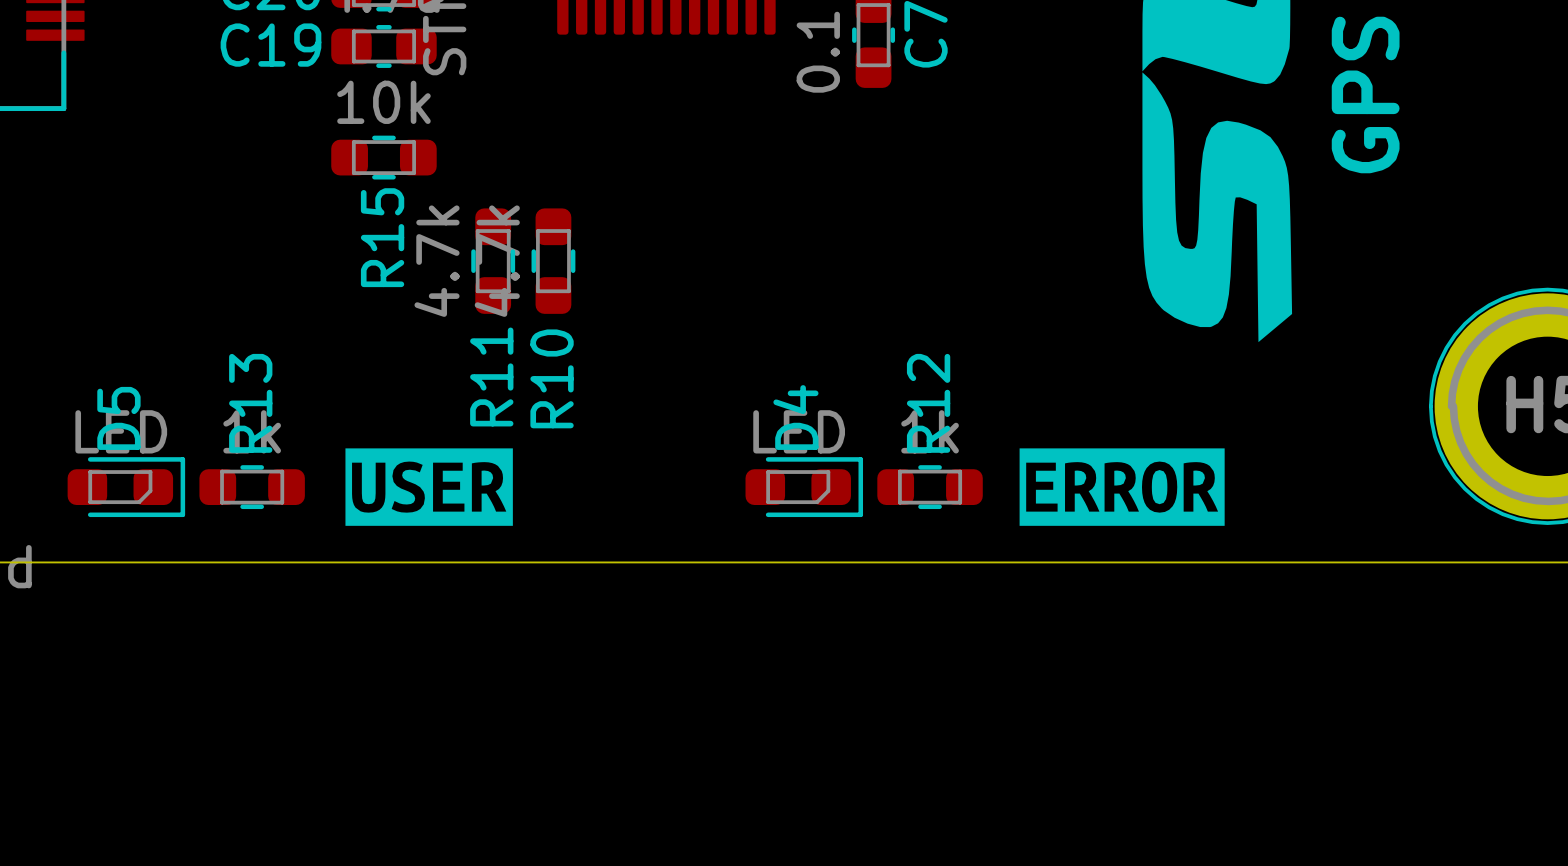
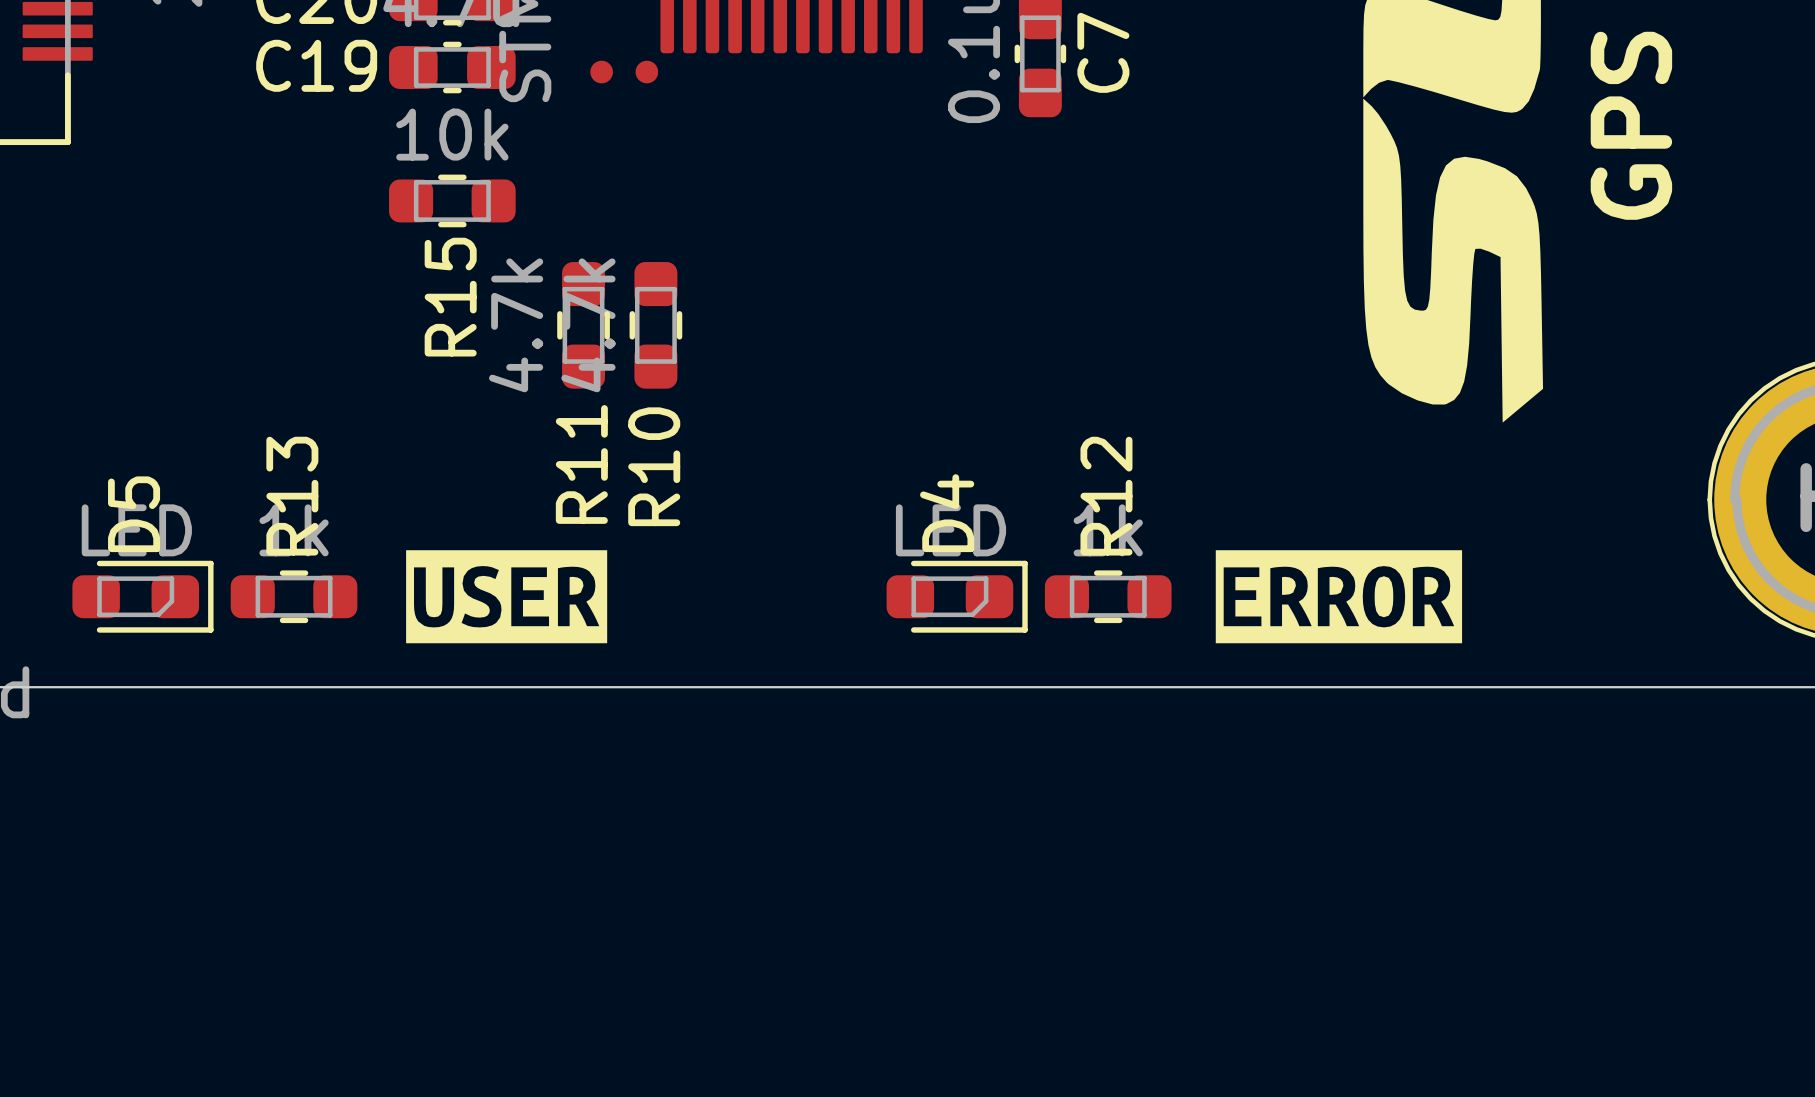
part: none -> (624, 72)

